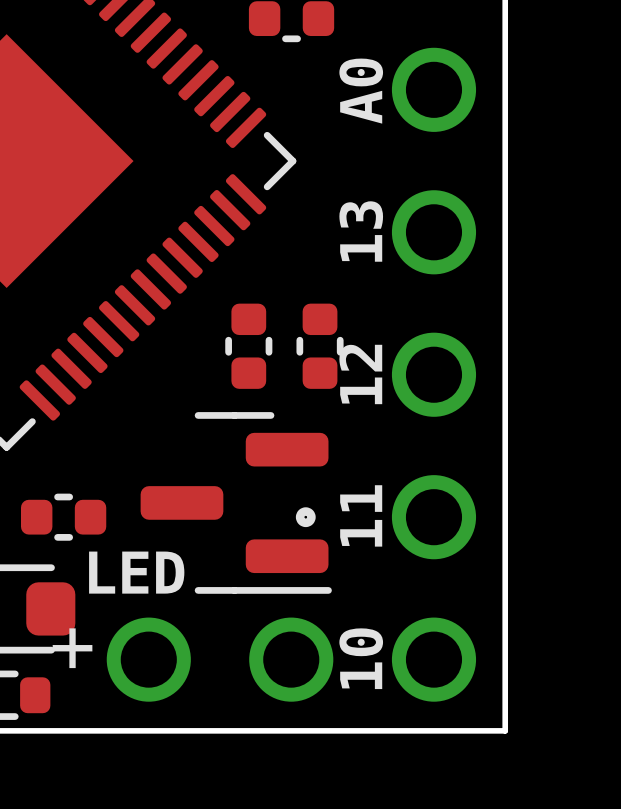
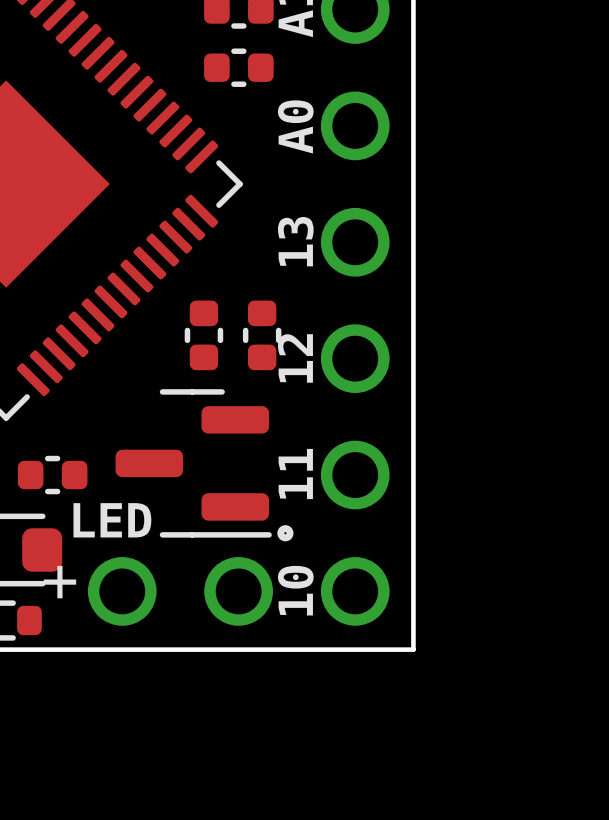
drawing position: (305, 517) -> (285, 533)

